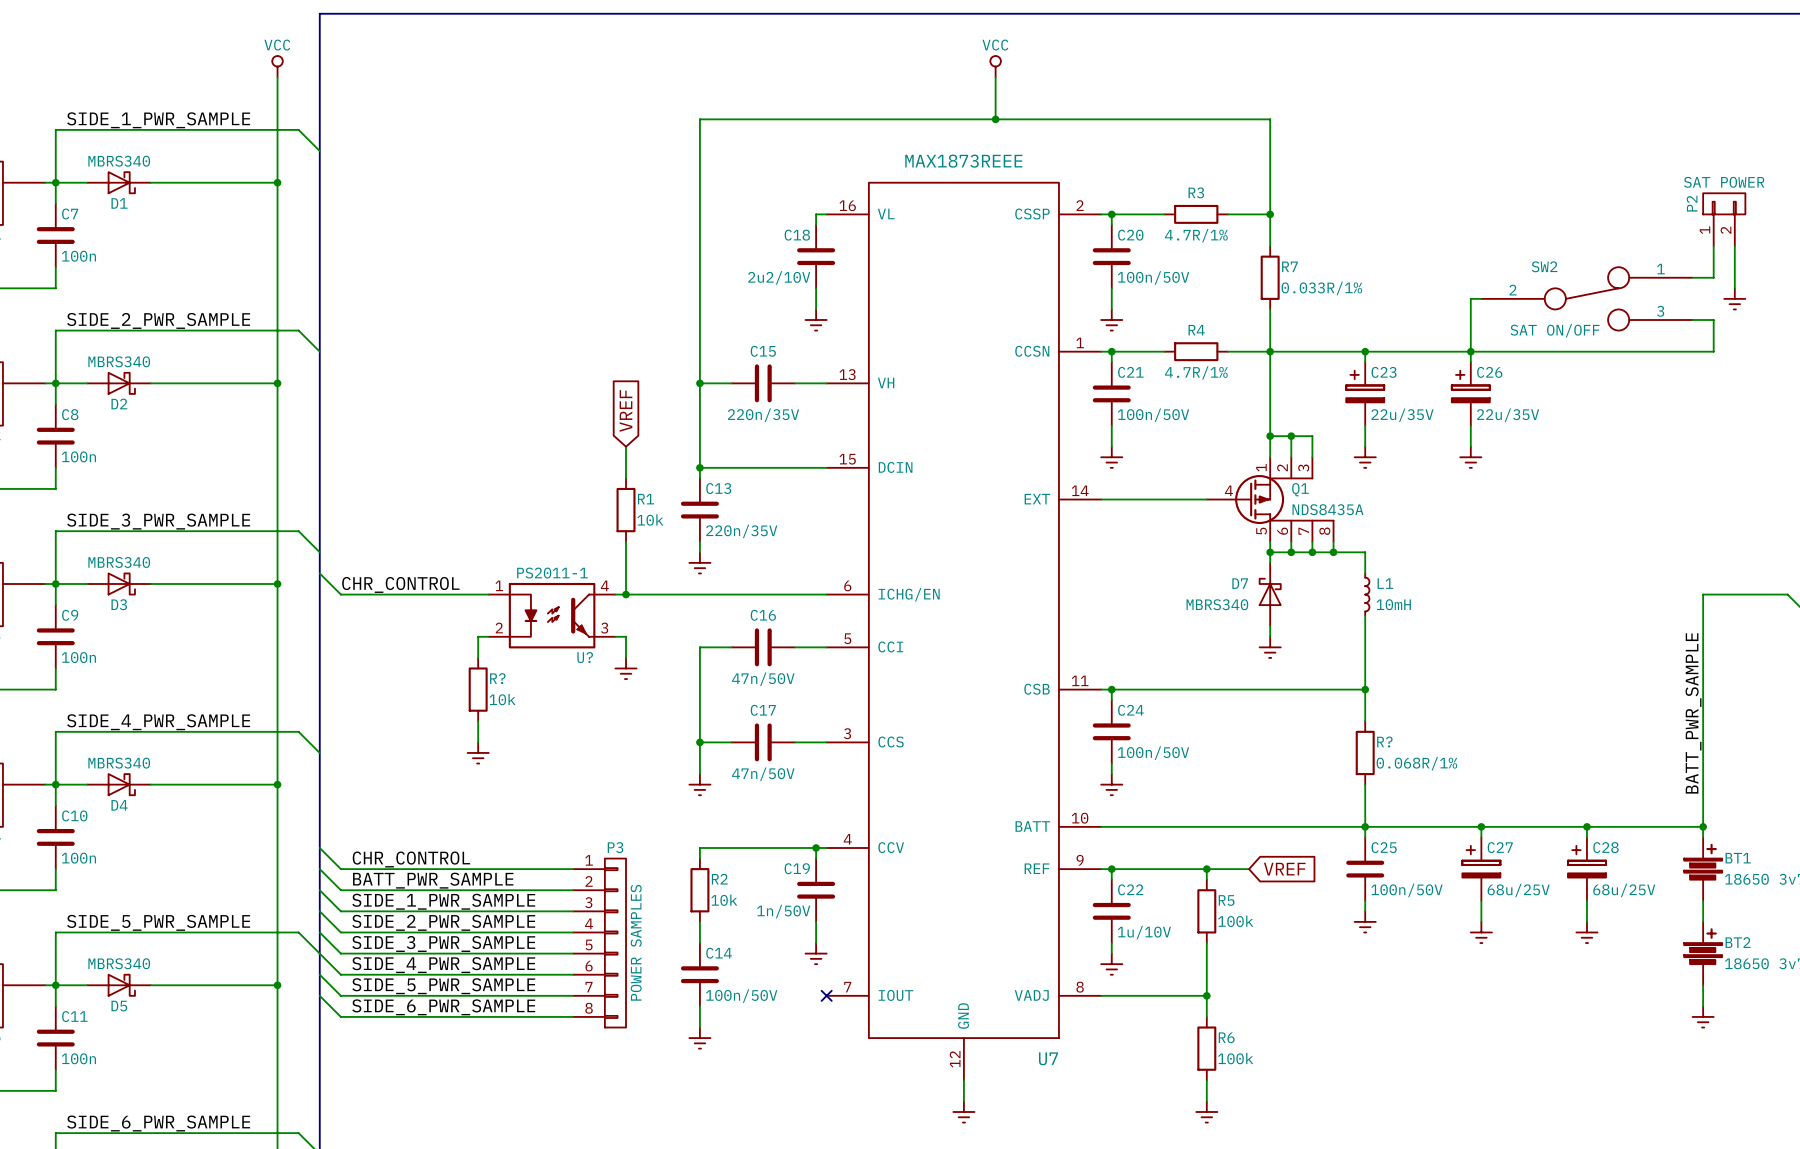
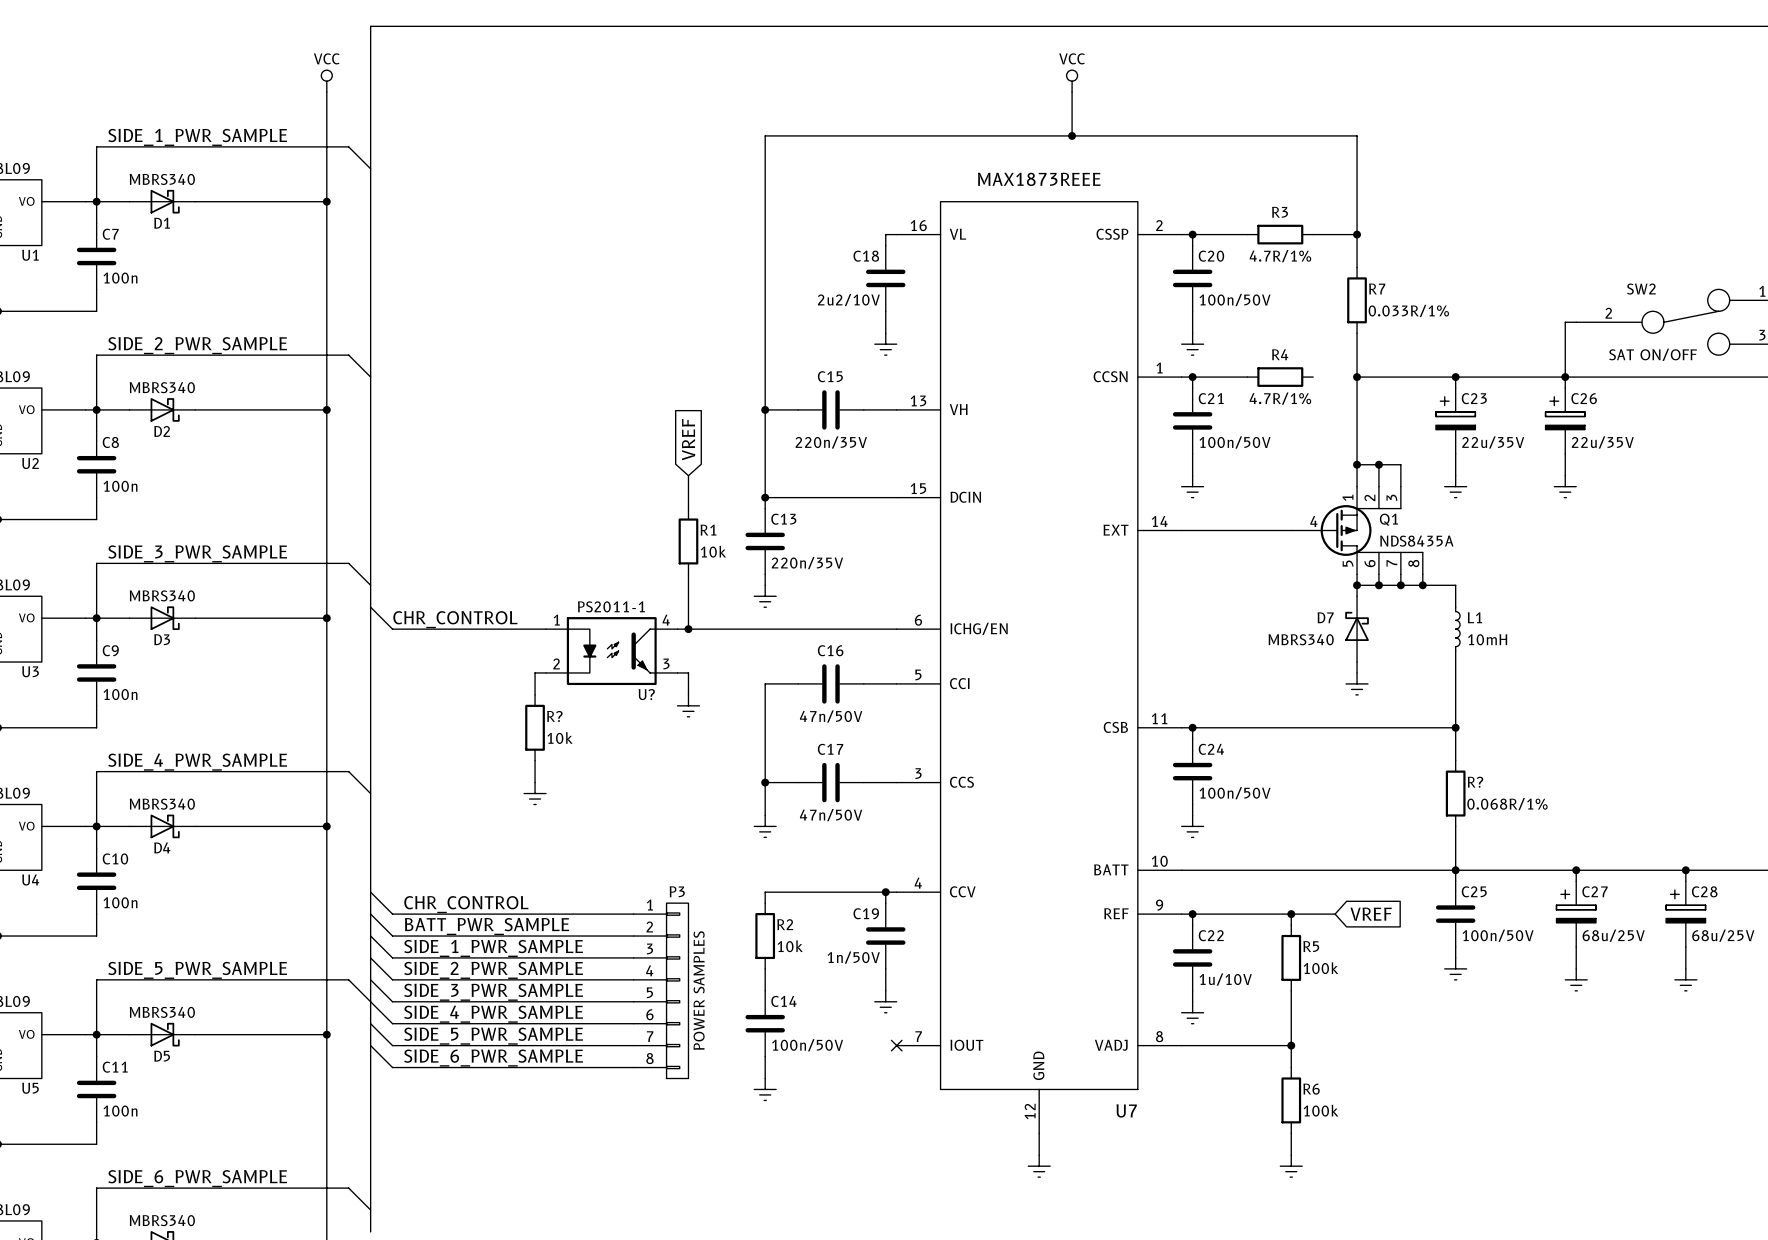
wire: (1227, 351) (1270, 351) -> none

